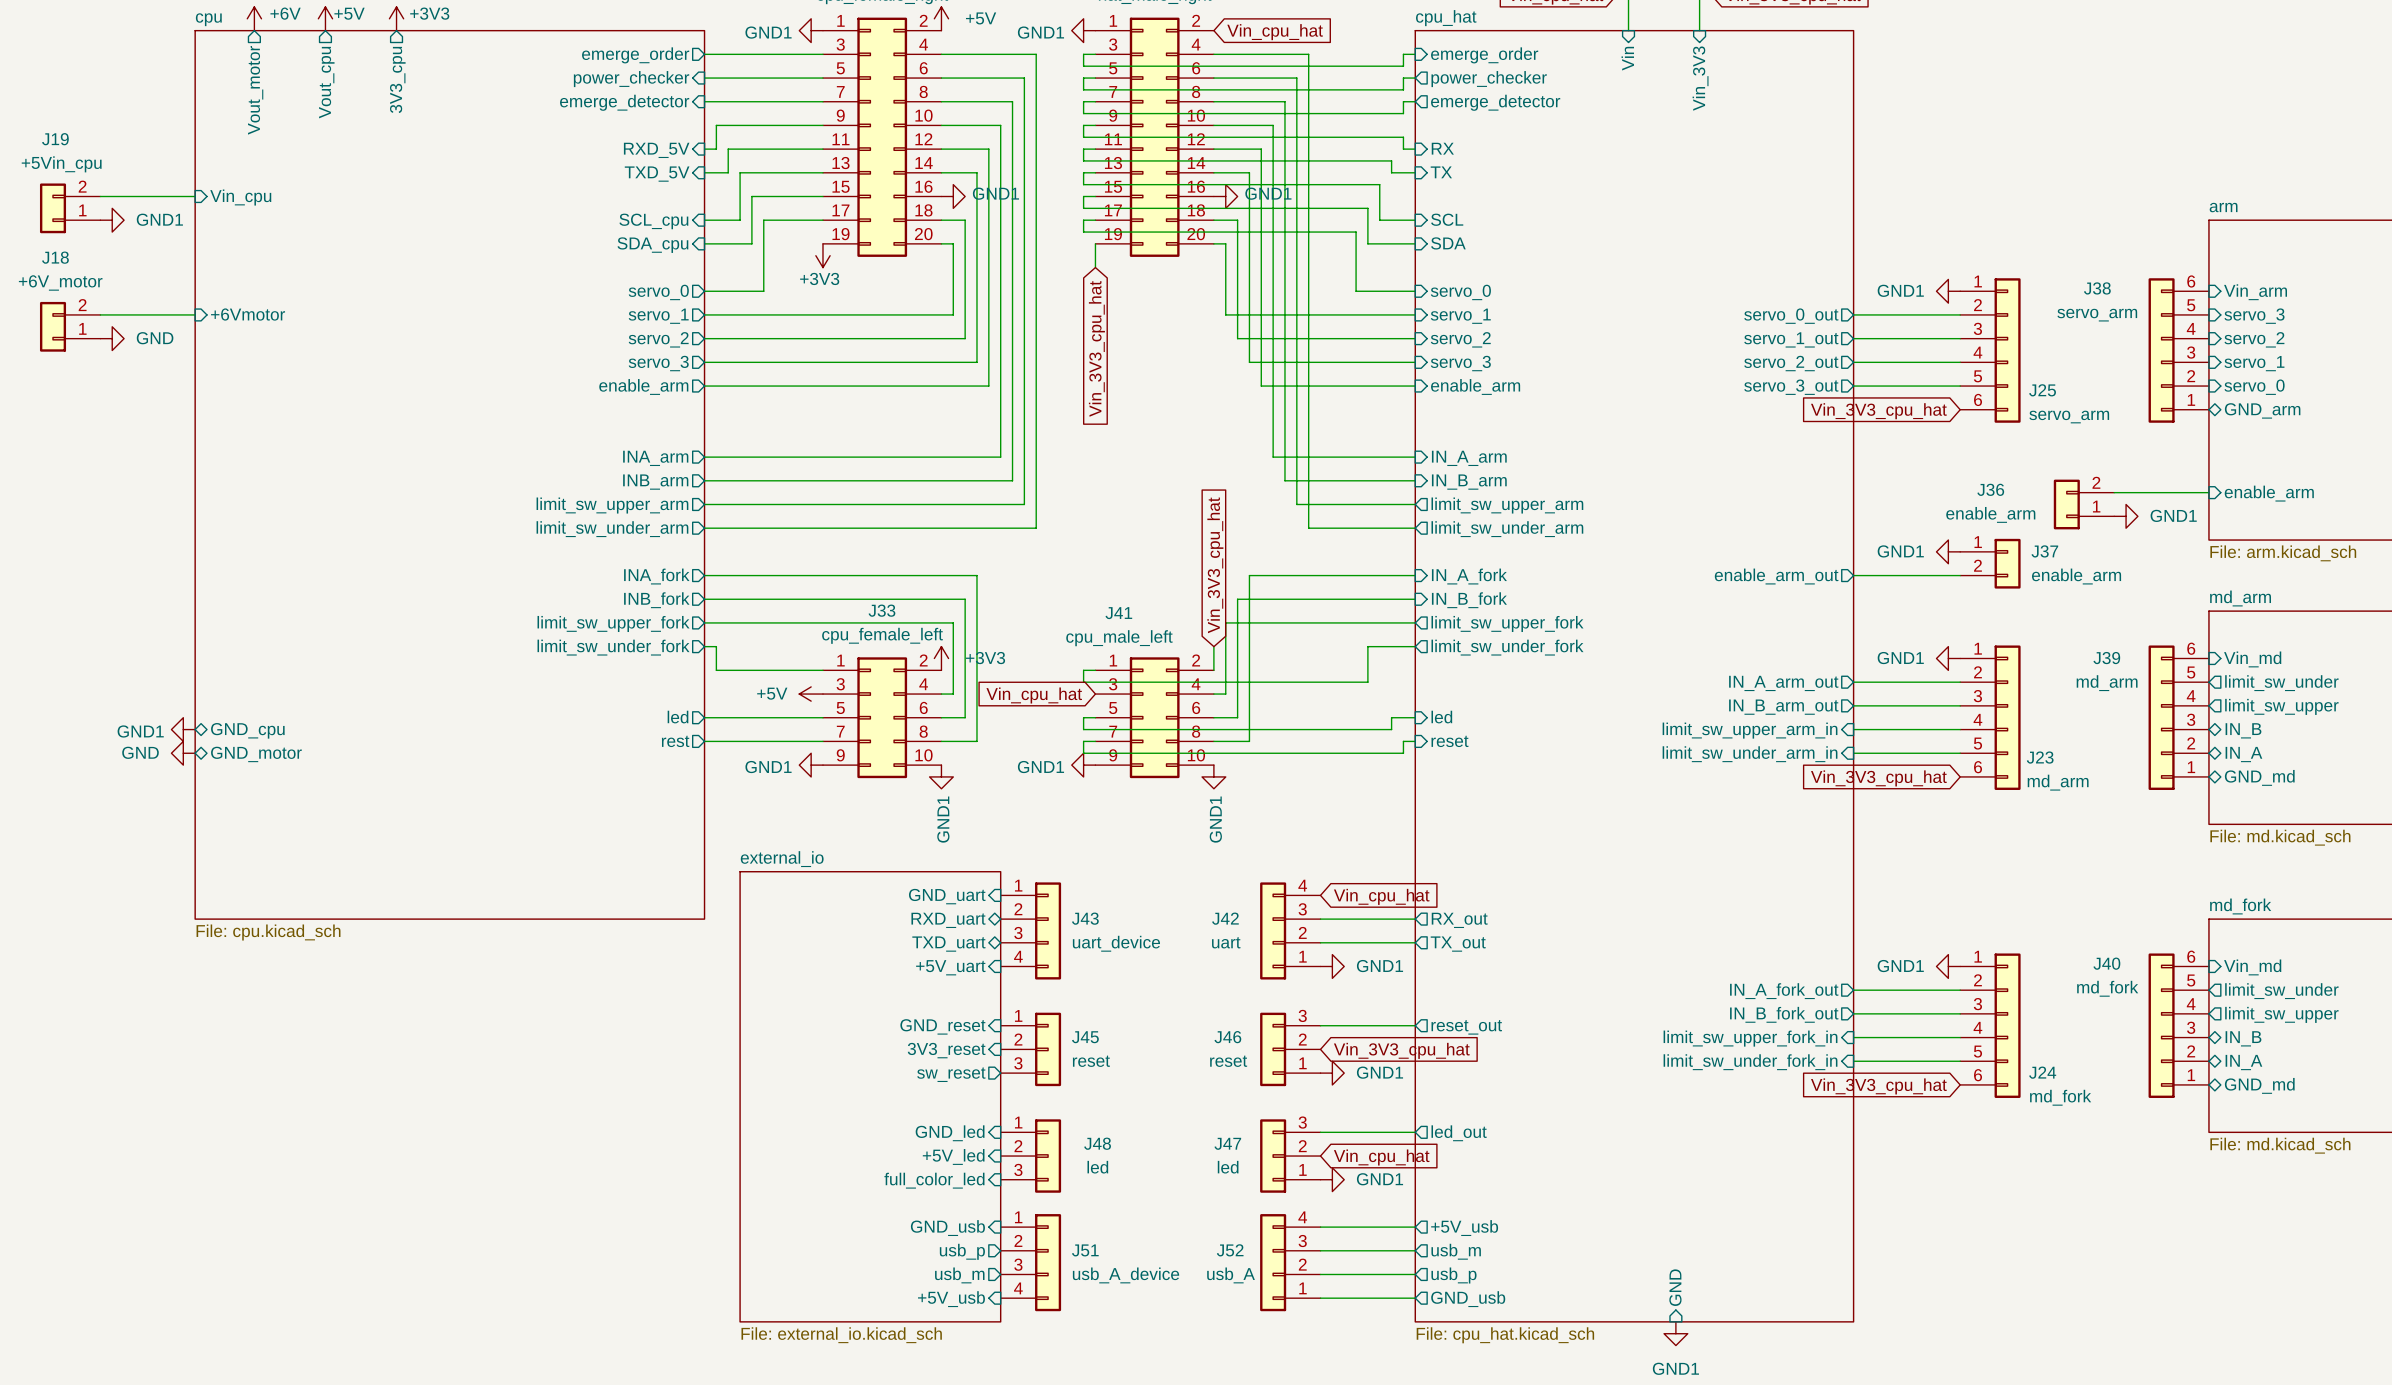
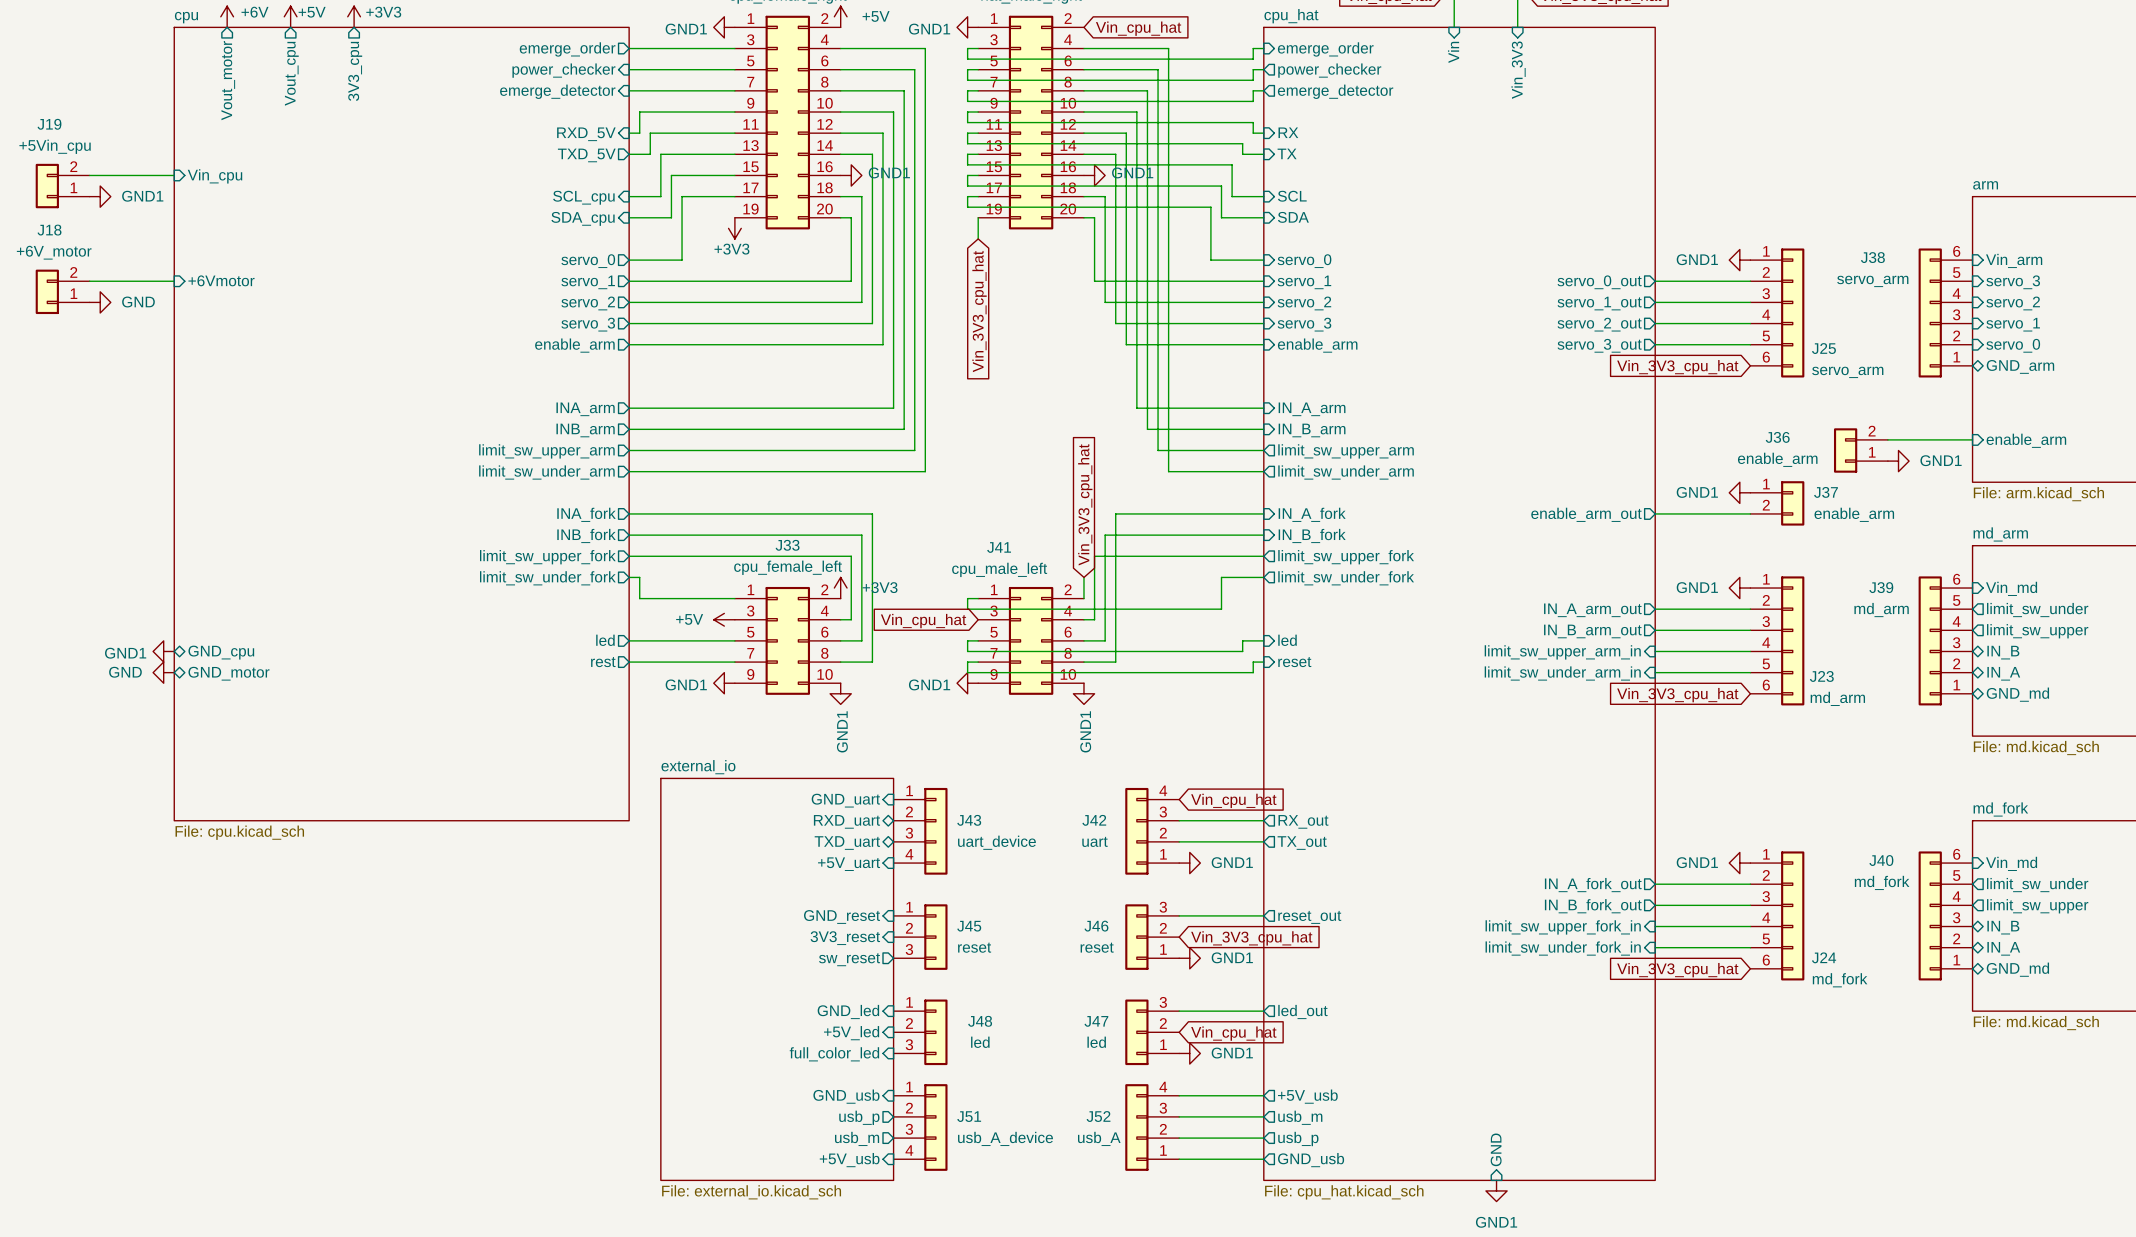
sheet pin shape: input (657, 174) -> output (586, 155)

